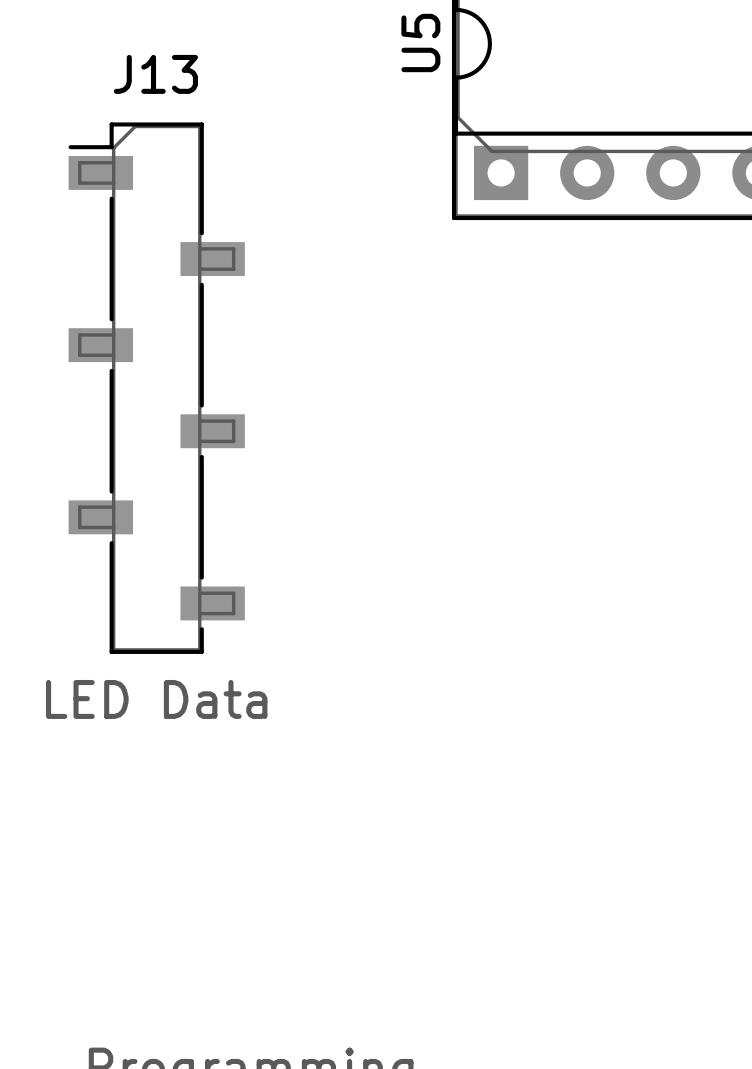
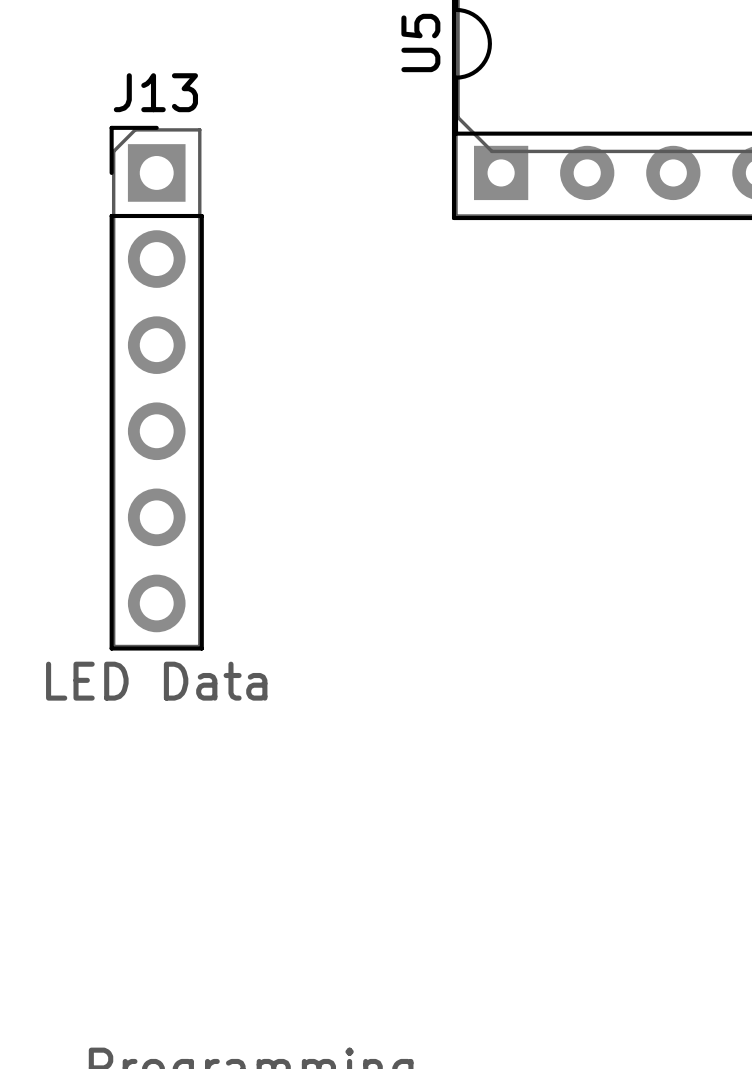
J13 footprint: [68, 122, 245, 654] -> [109, 125, 204, 651]

